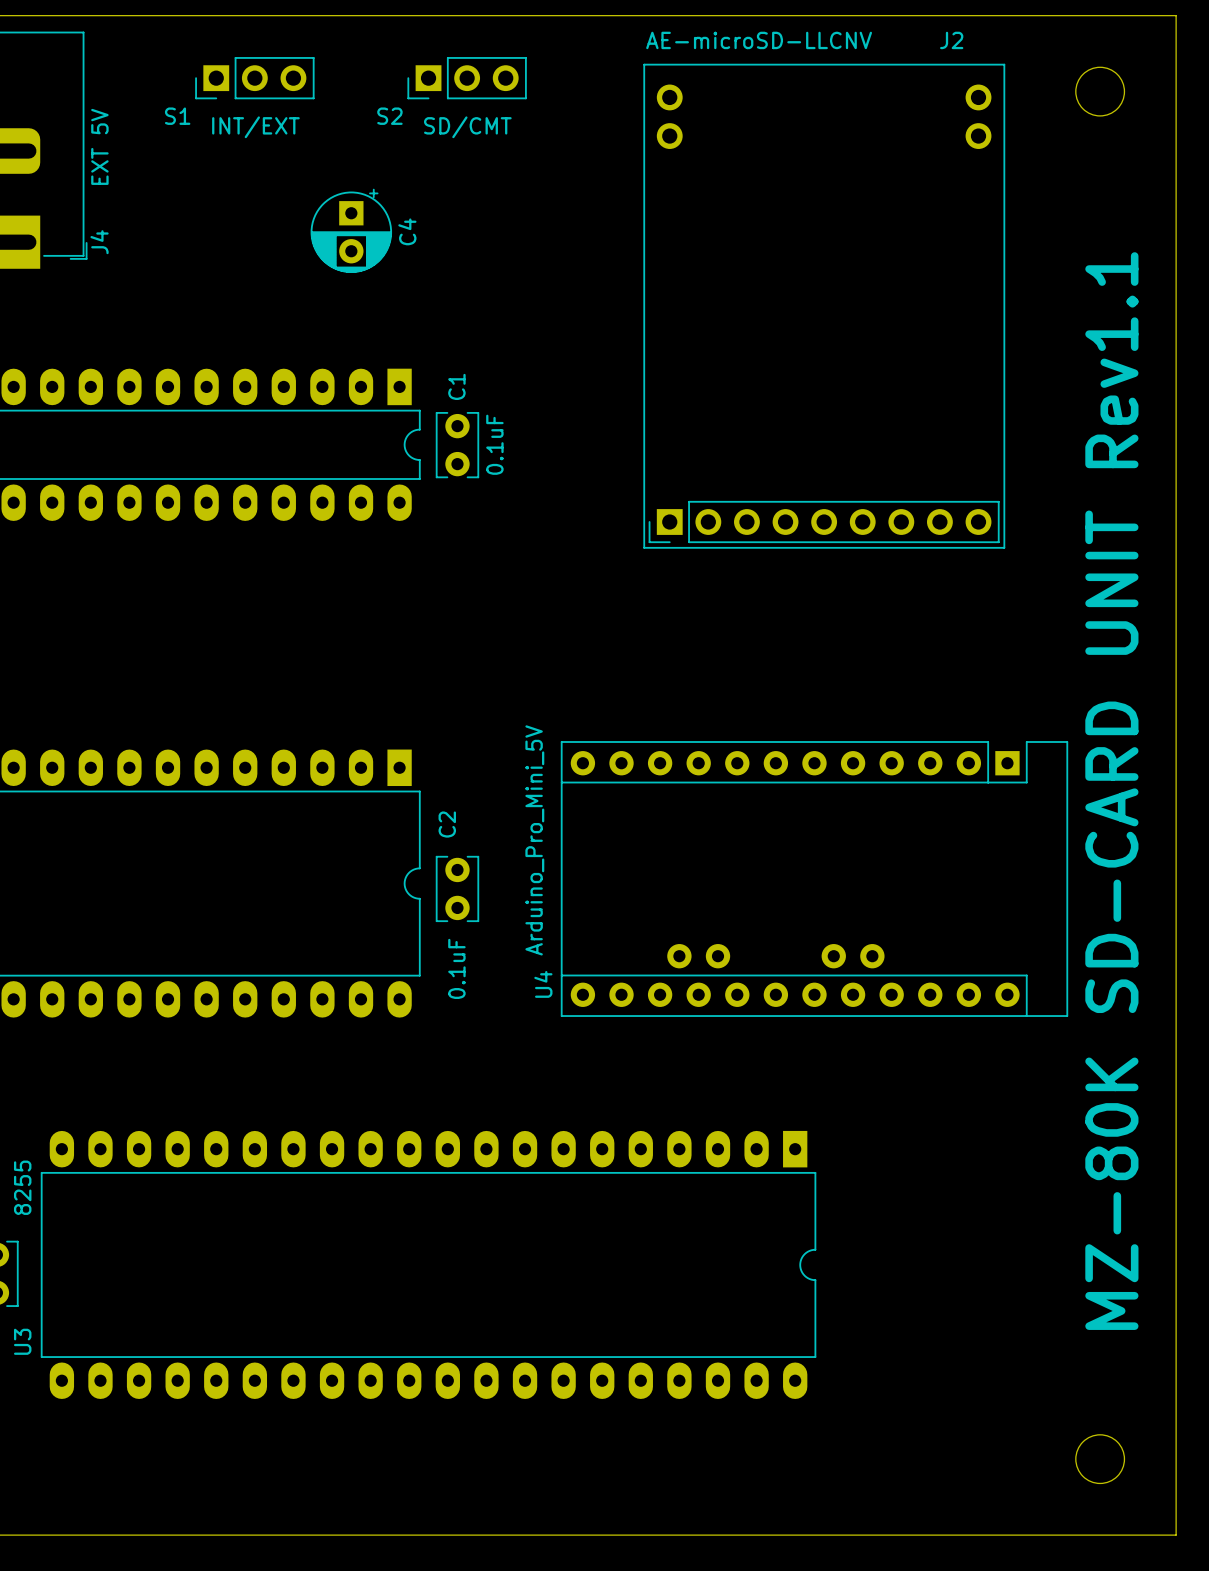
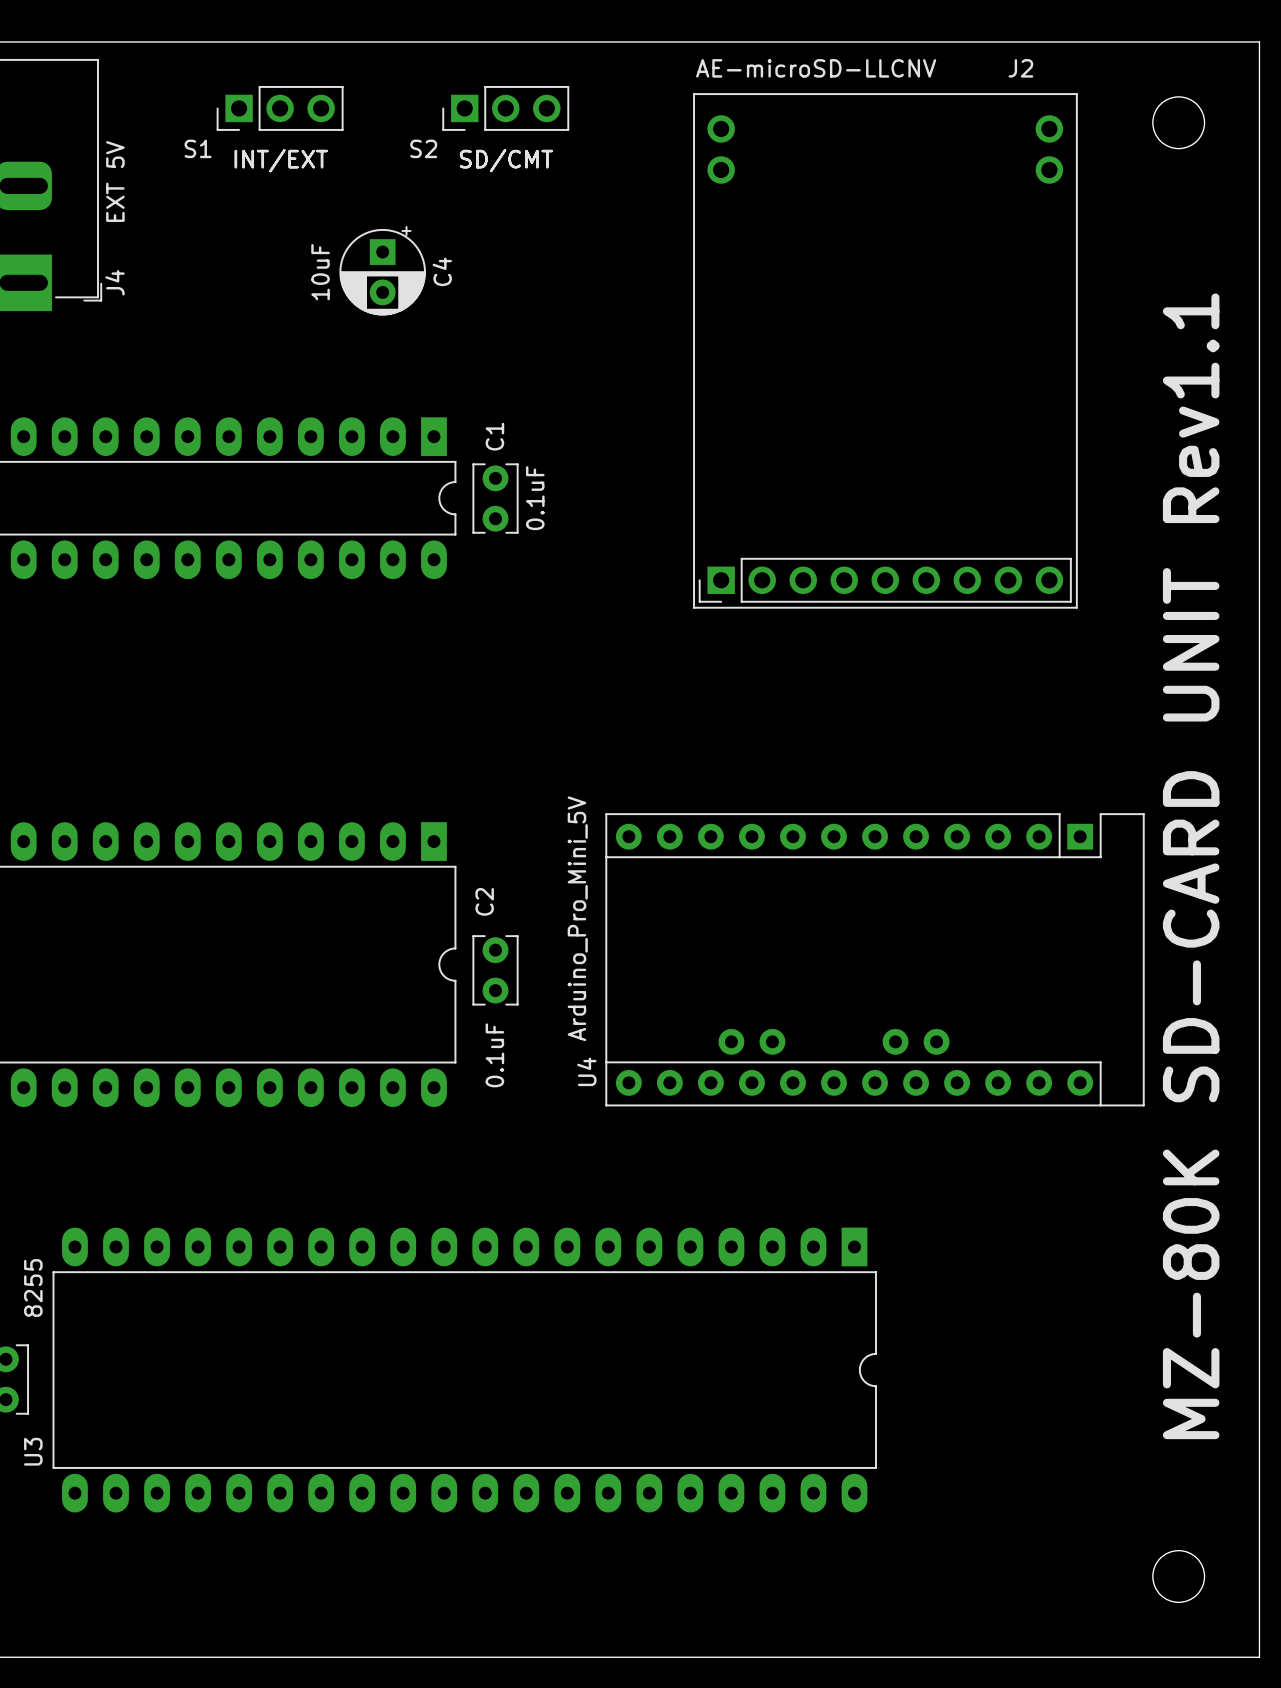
text: none -> INT/EXT (281, 160)
text: none -> SD/CMT (506, 160)
text: none -> 10uF (320, 272)

